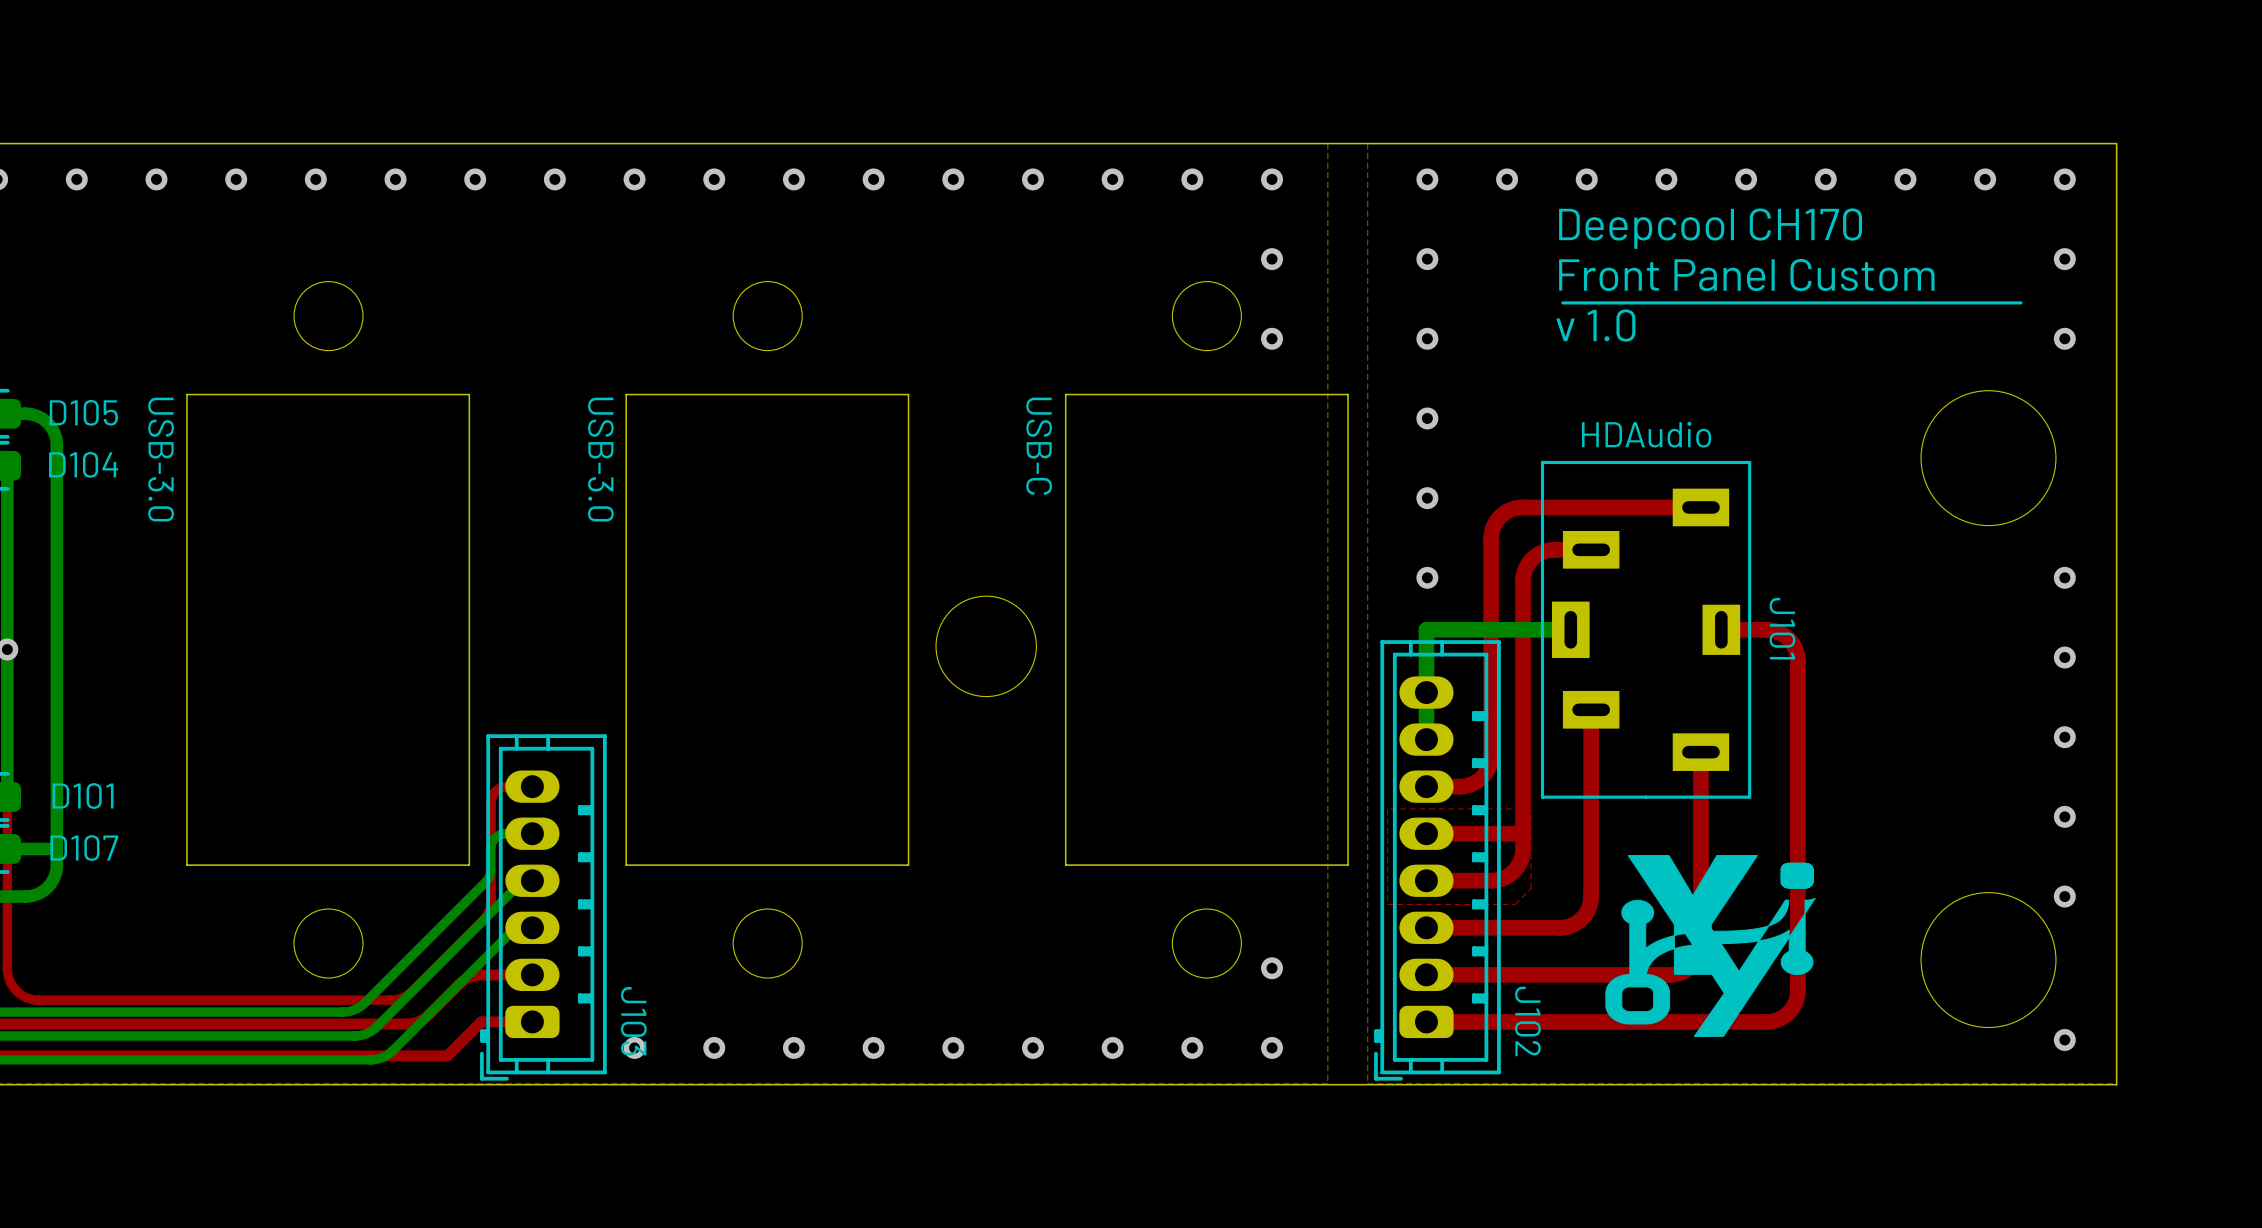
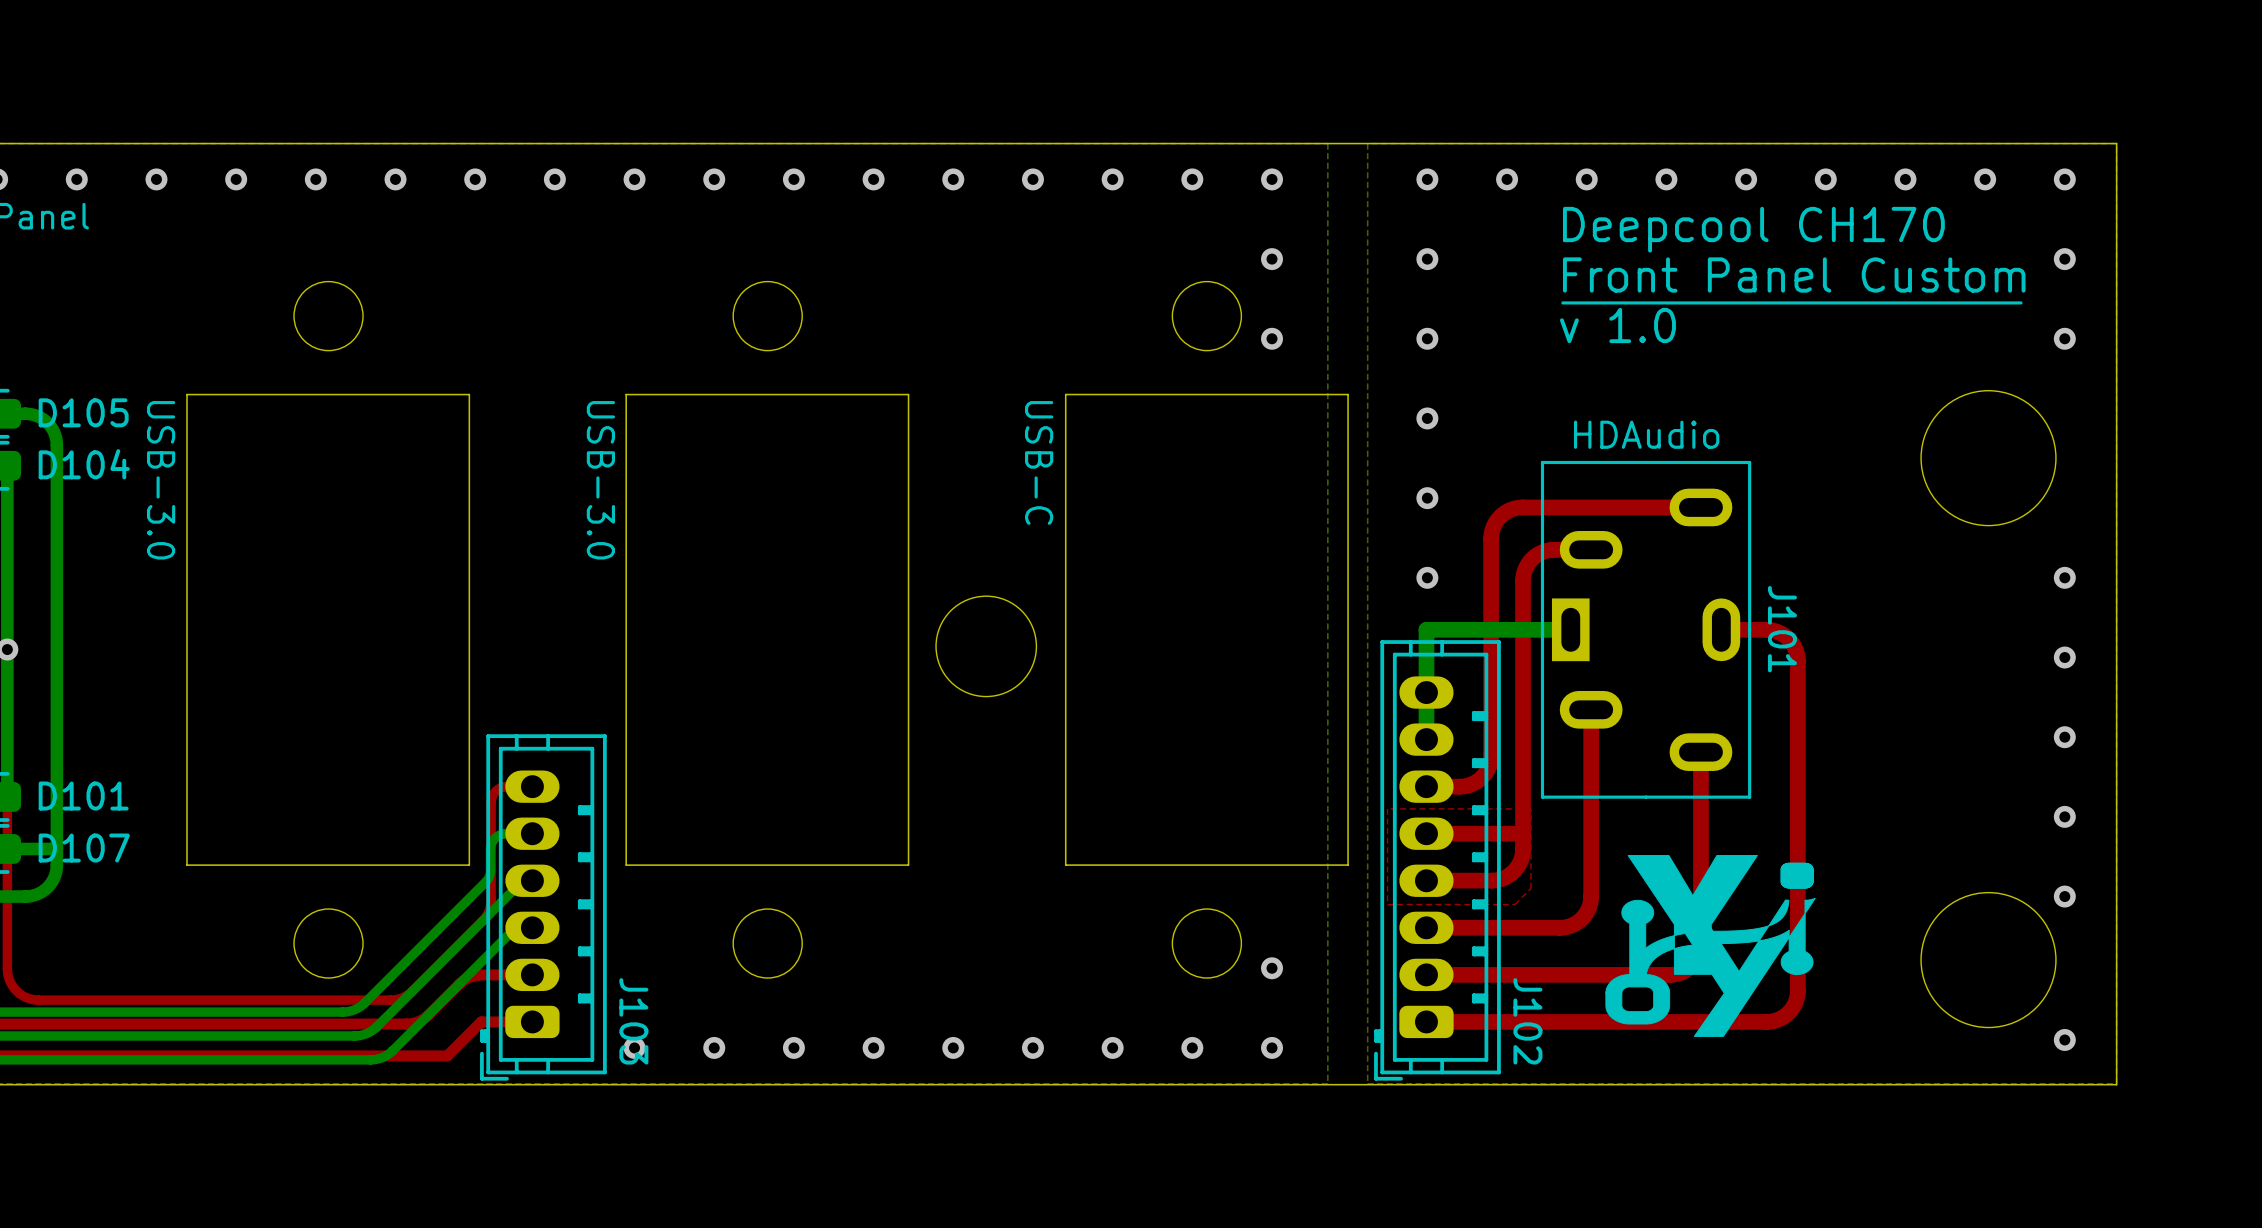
J101 footprint: [1540, 460, 1752, 799] -> [1540, 460, 1752, 799]

